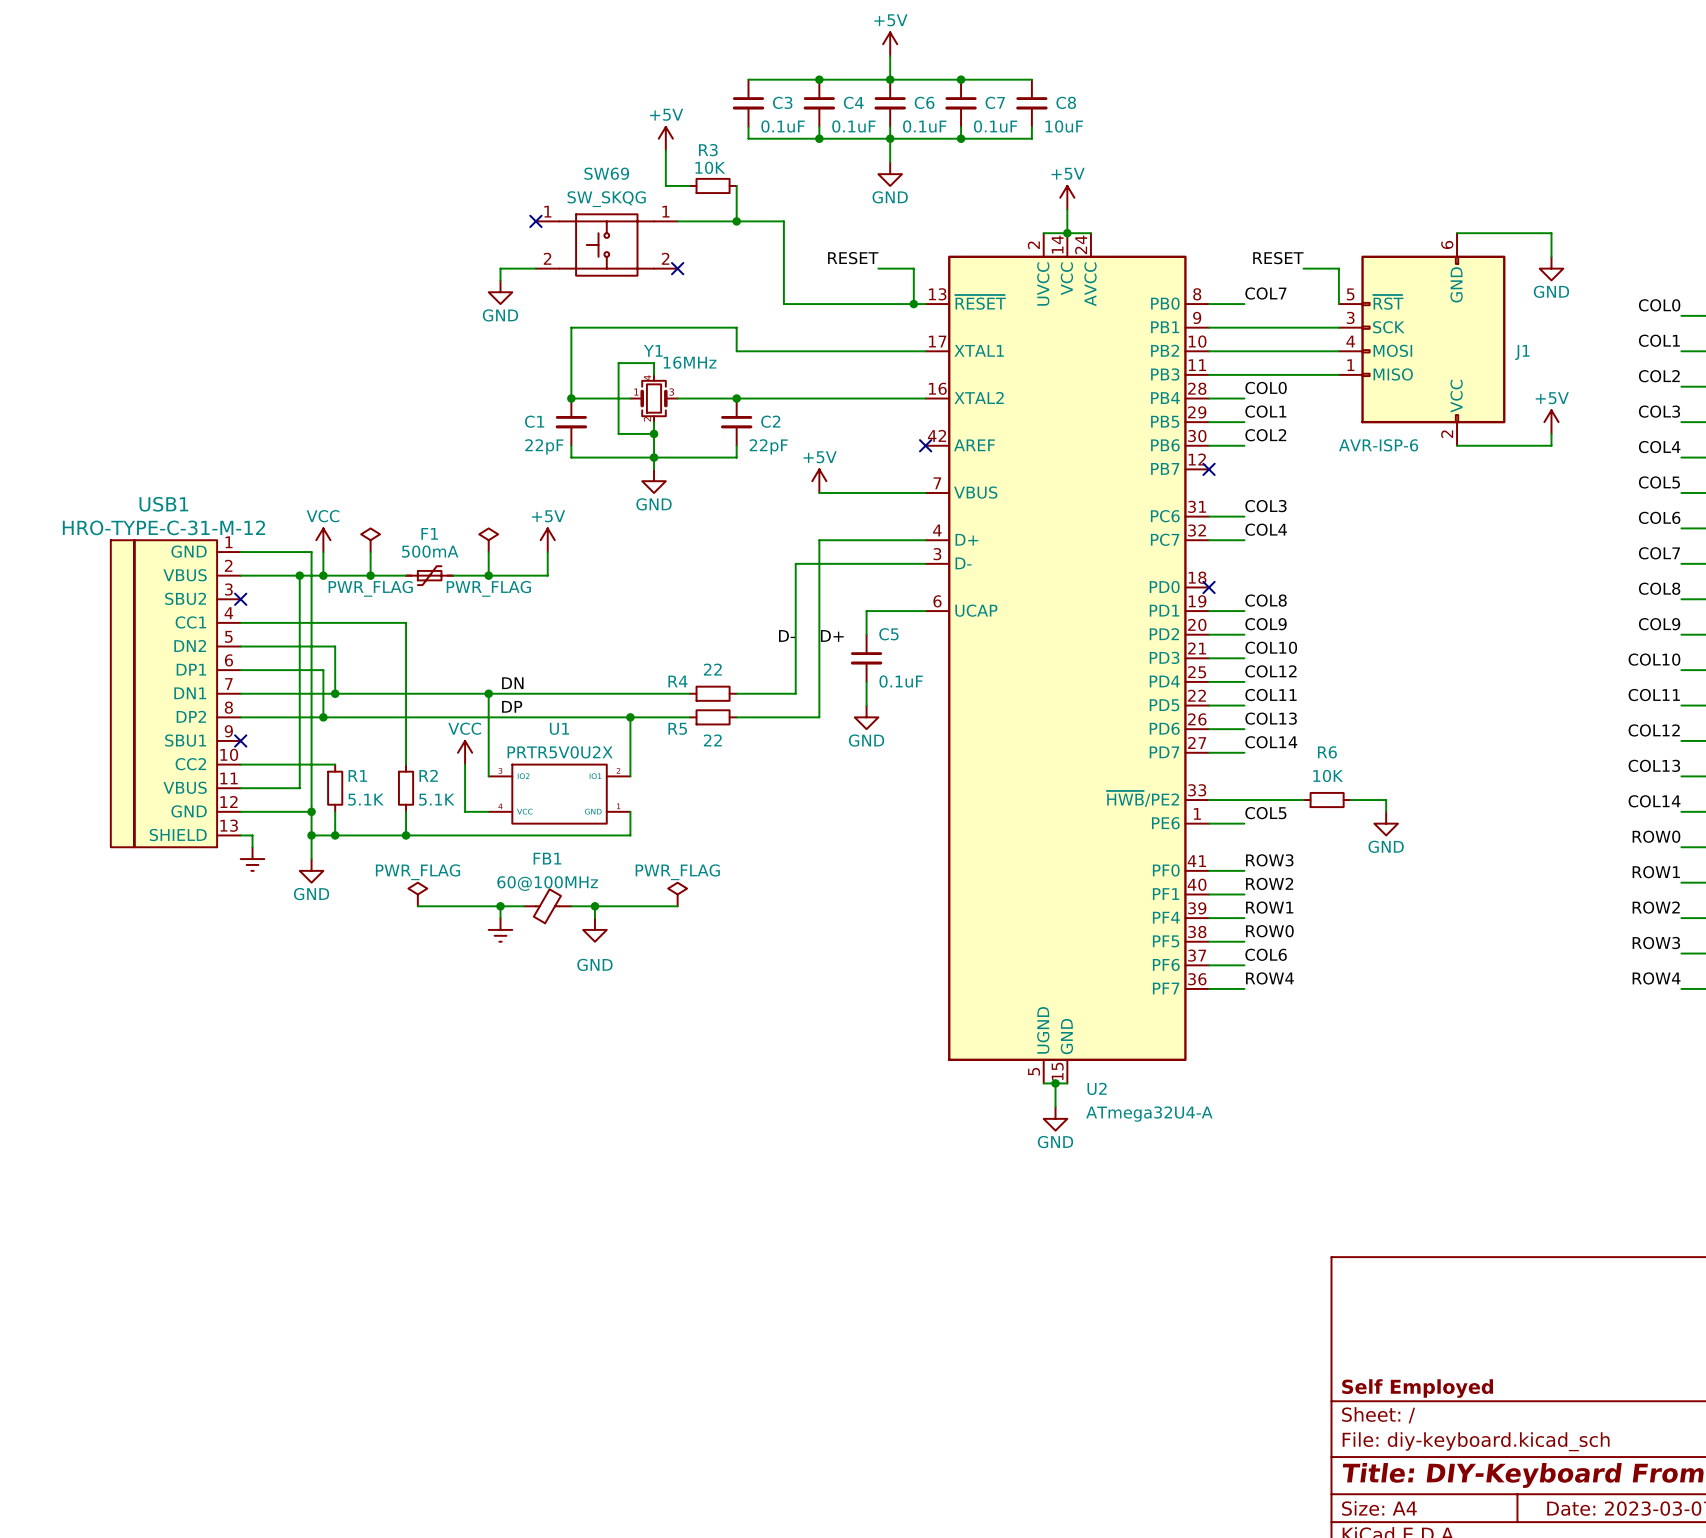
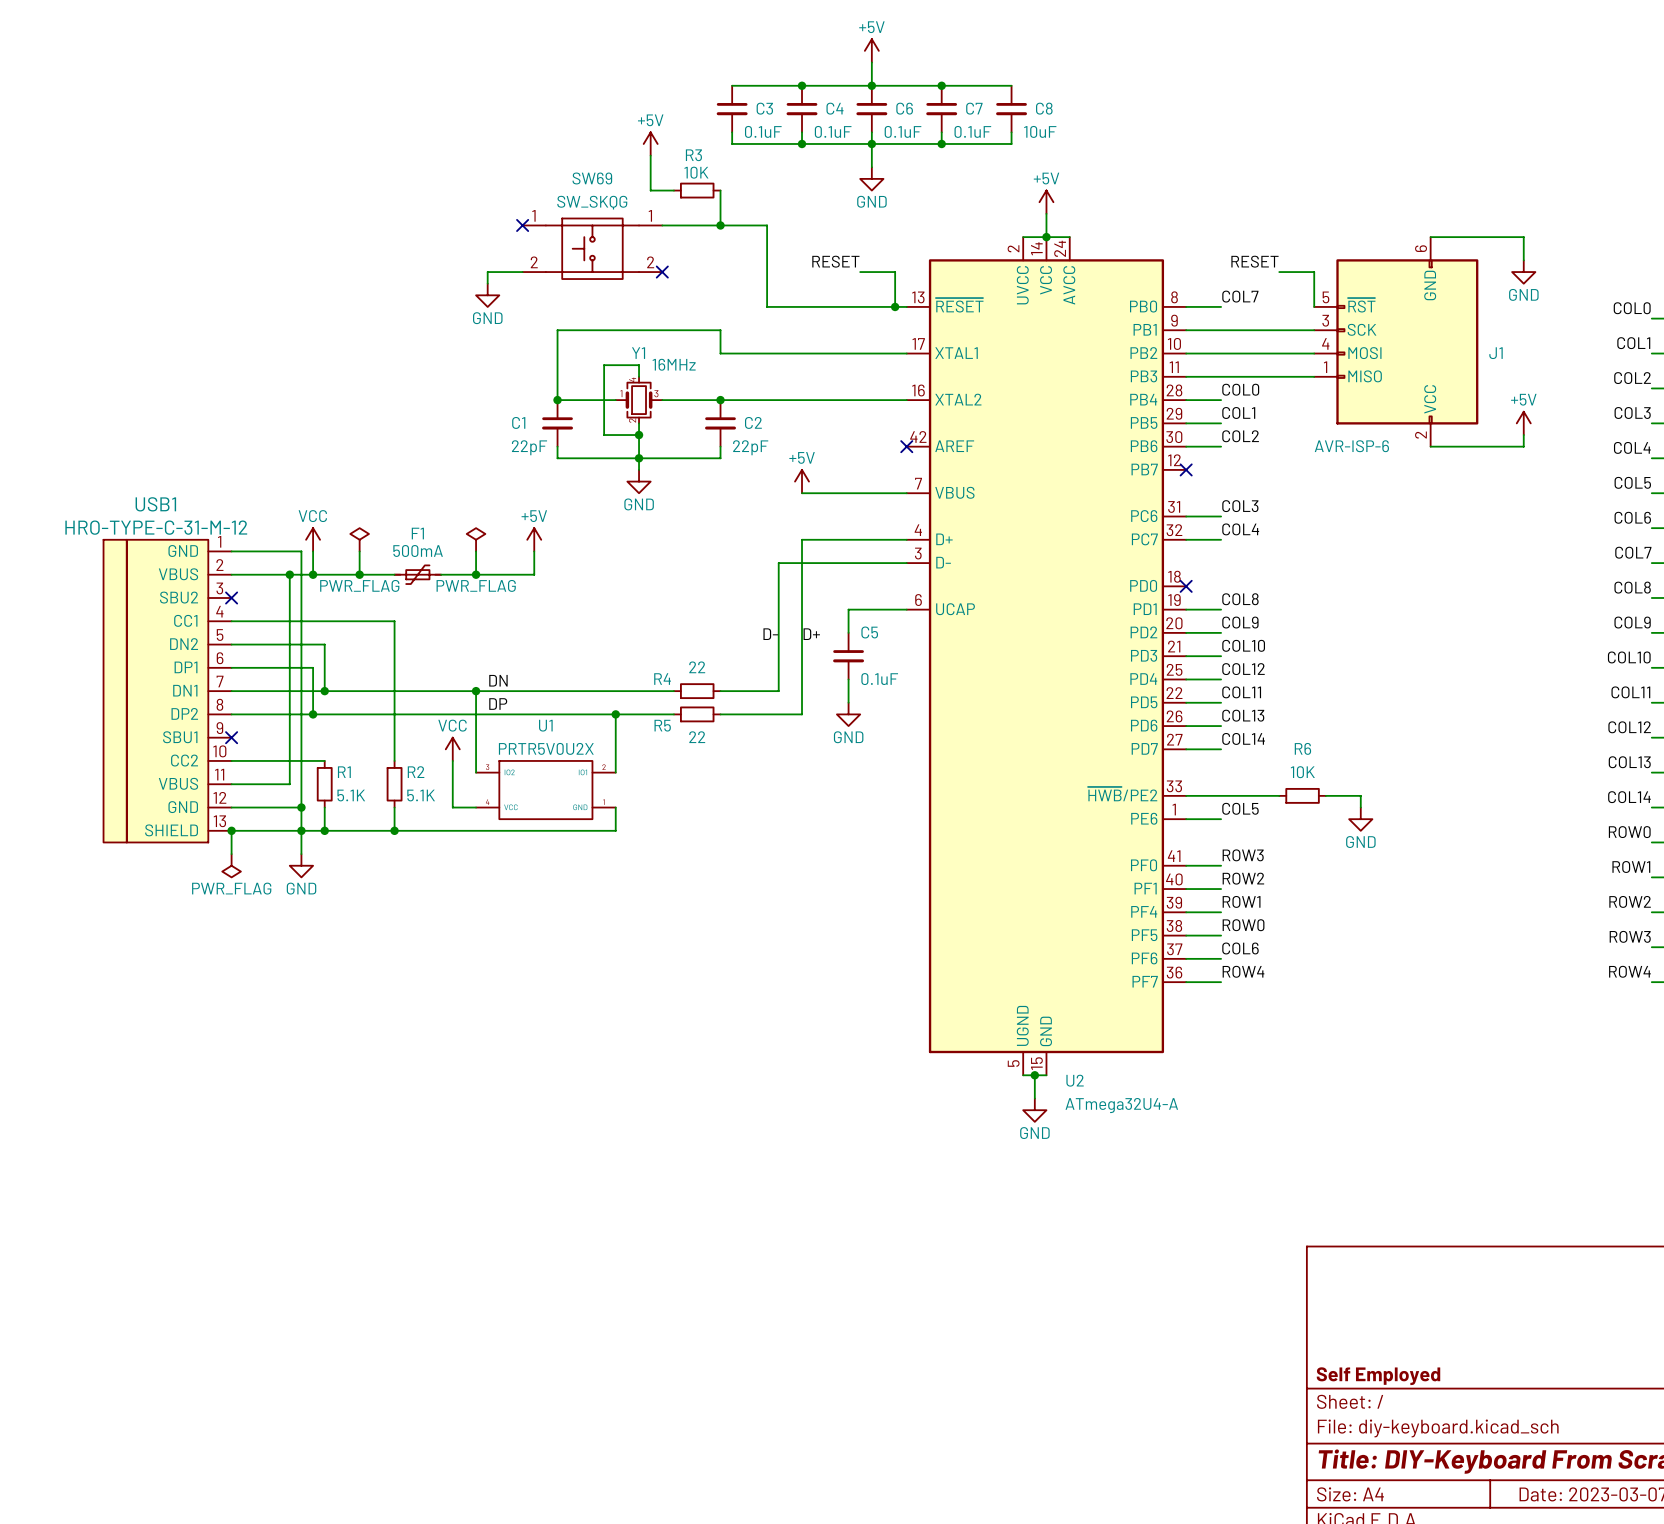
wire: none -> (231, 830) (231, 854)
junction: none -> (231, 830)
wire: (252, 835) (252, 847) -> (243, 830) (301, 830)
power symbol: (252, 859) -> none
power symbol rotation: 0° (417, 894) -> 180° (231, 865)
power symbol position: PWR_FLAG (417, 894) -> PWR_FLAG (231, 865)
power symbol: PWR_FLAG (677, 894) -> none
wire: (417, 906) (524, 906) -> none
wire: (500, 906) (500, 918) -> none
junction: (500, 906) -> none
FB1: 60@100MHz (547, 906) -> none
wire: (571, 906) (677, 906) -> none
wire: (594, 906) (594, 918) -> none
junction: (594, 906) -> none
power symbol: (500, 929) -> none
power symbol: GND (594, 929) -> none

